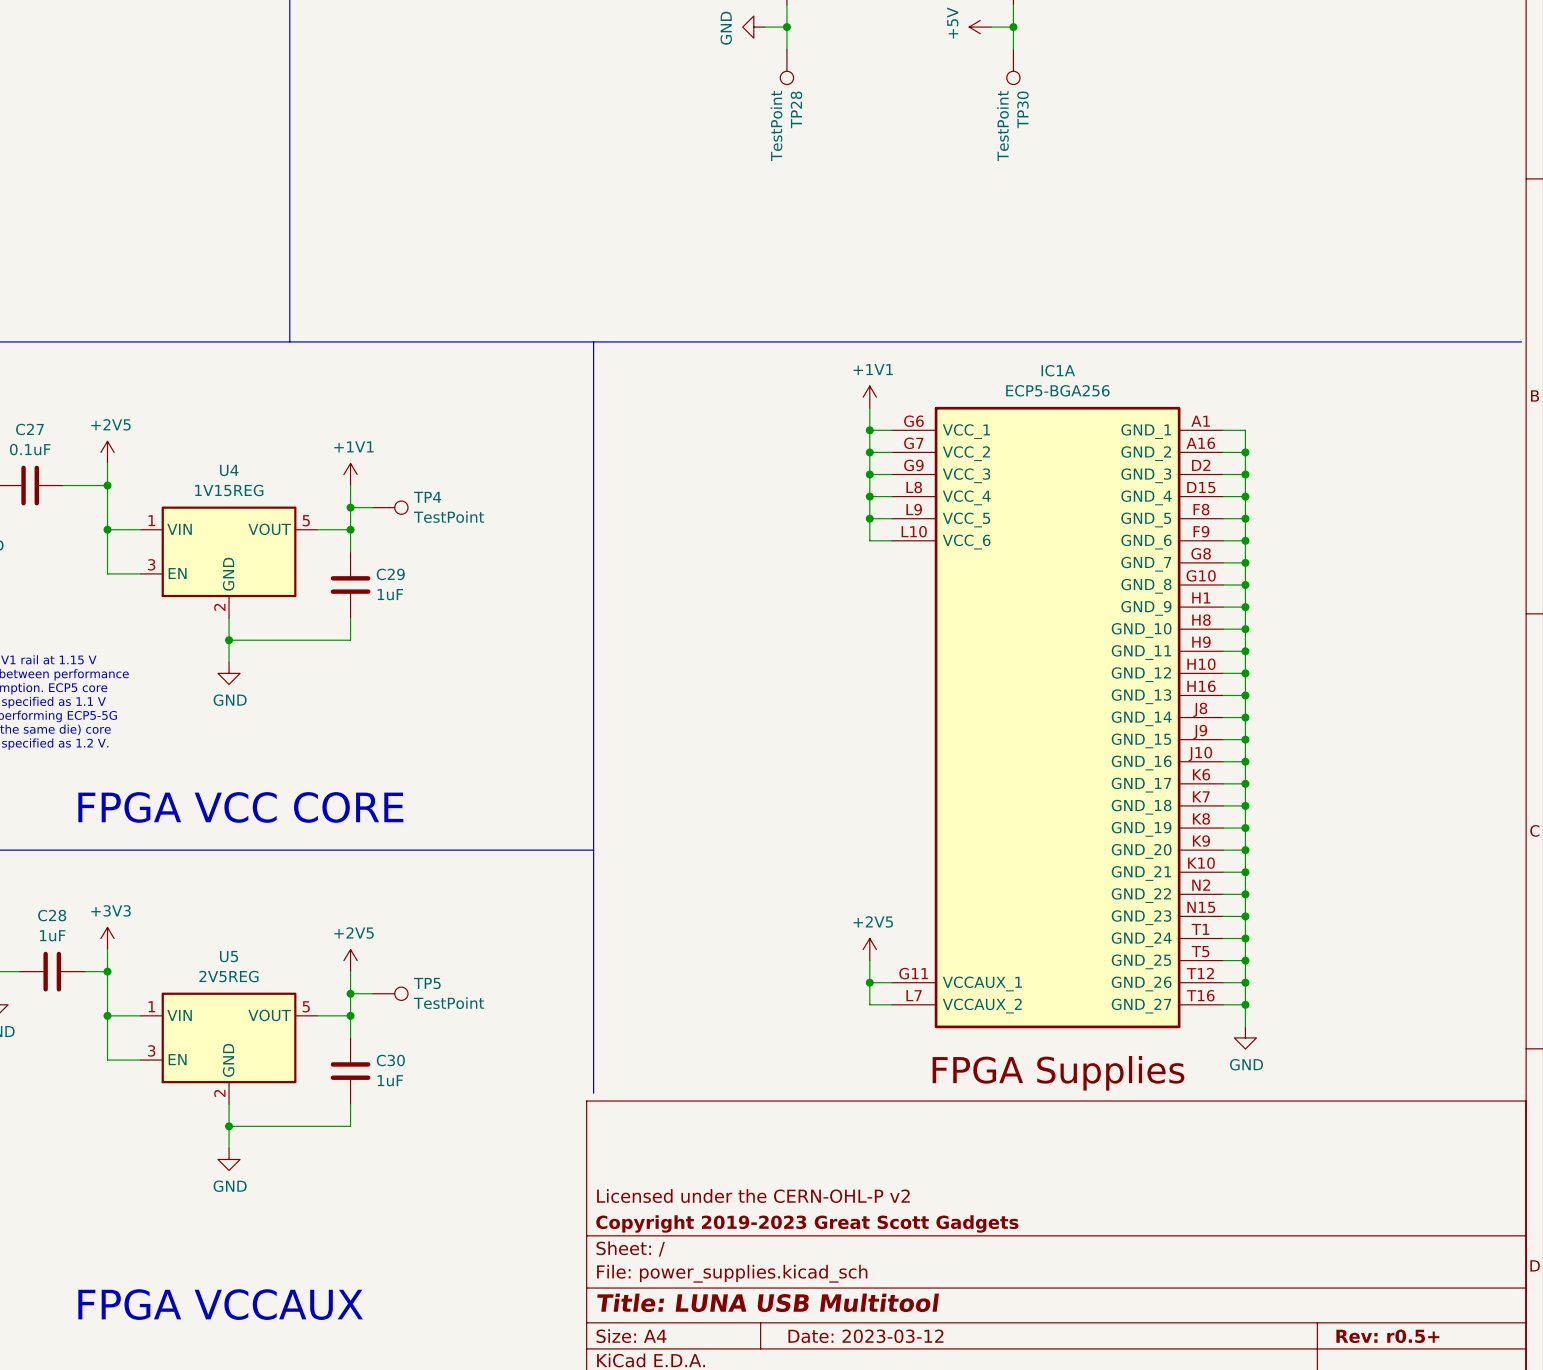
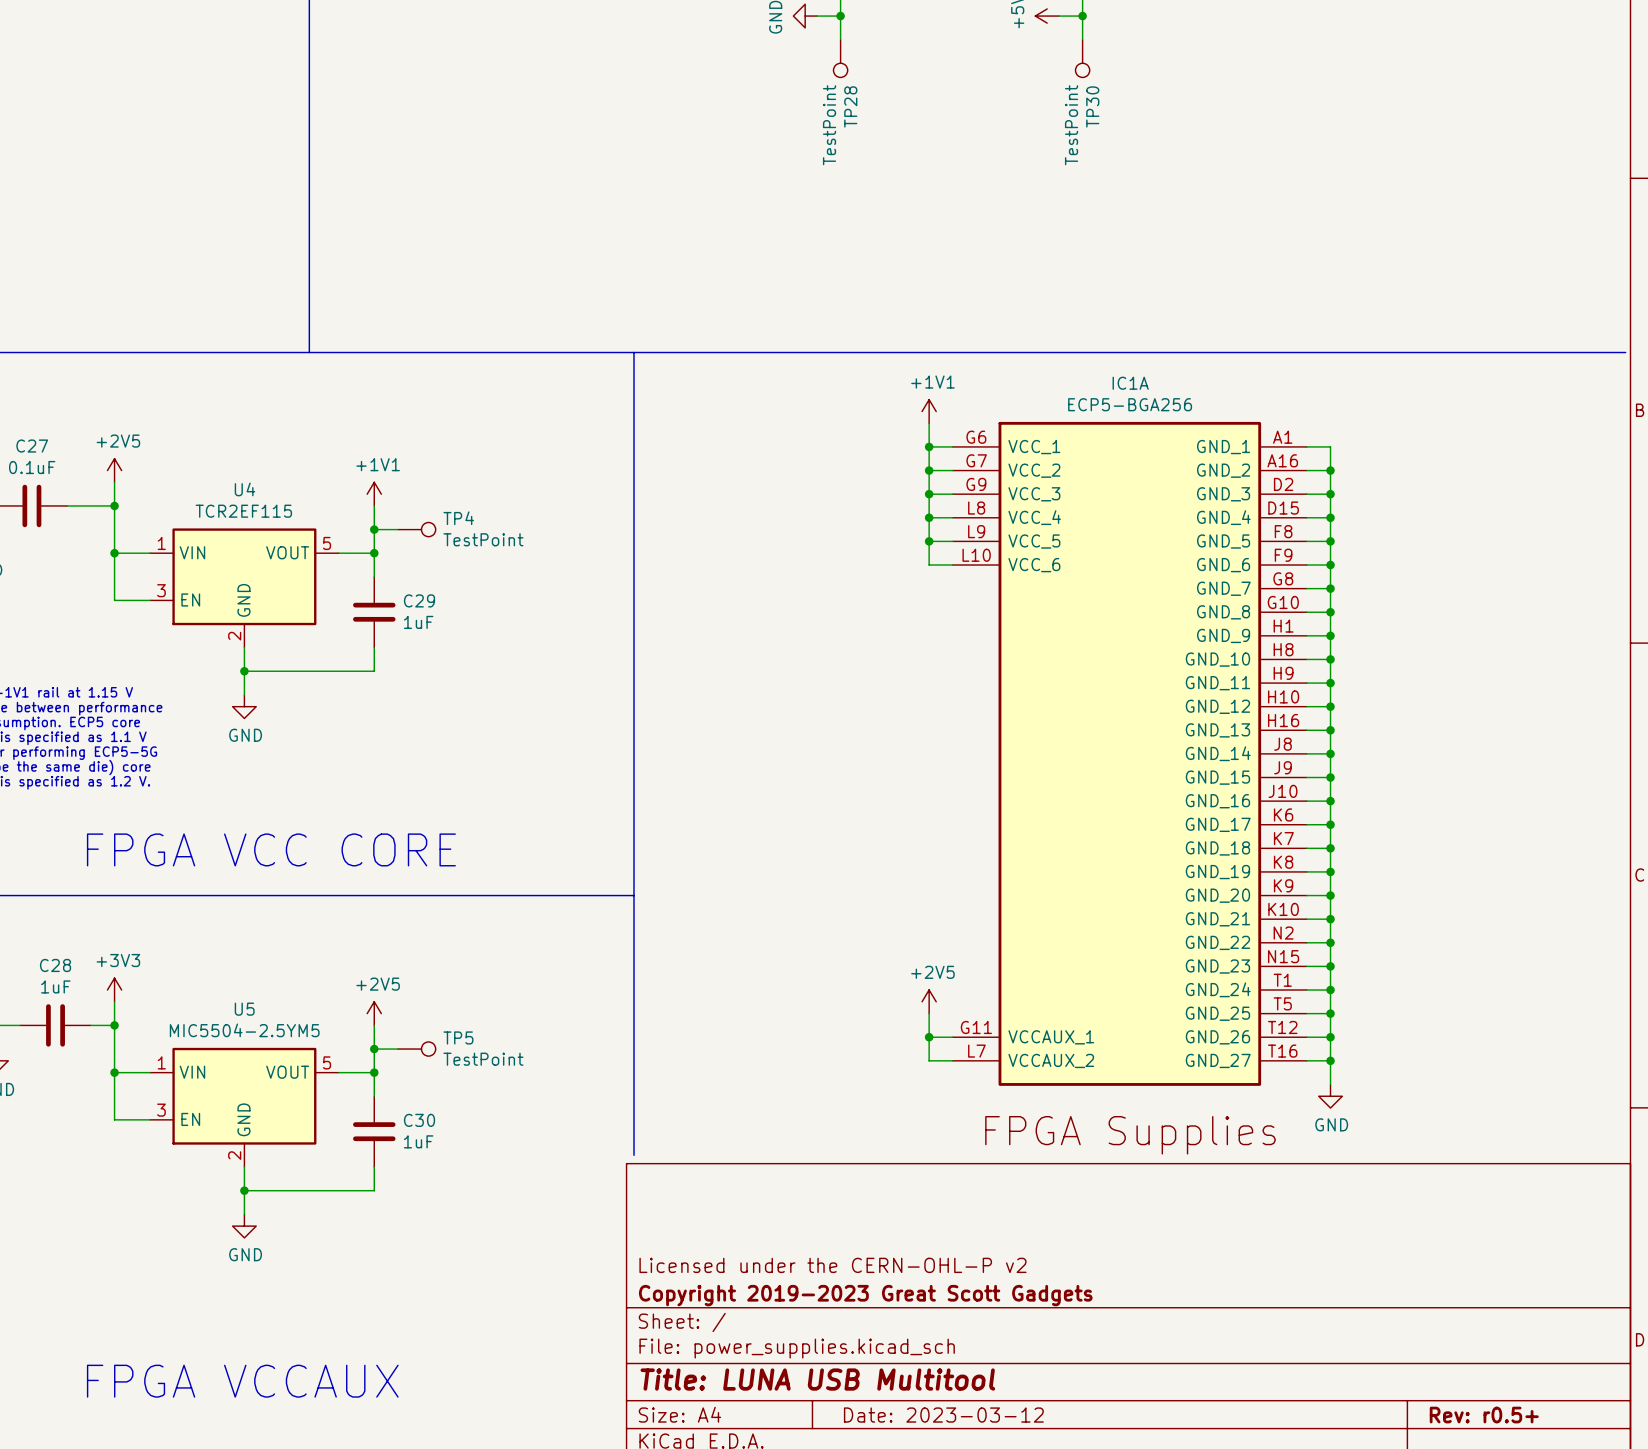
U4 value: 1V15REG (229, 490) -> TCR2EF115 (243, 511)
U5 value: 2V5REG (228, 976) -> MIC5504-2.5YM5 (244, 1030)

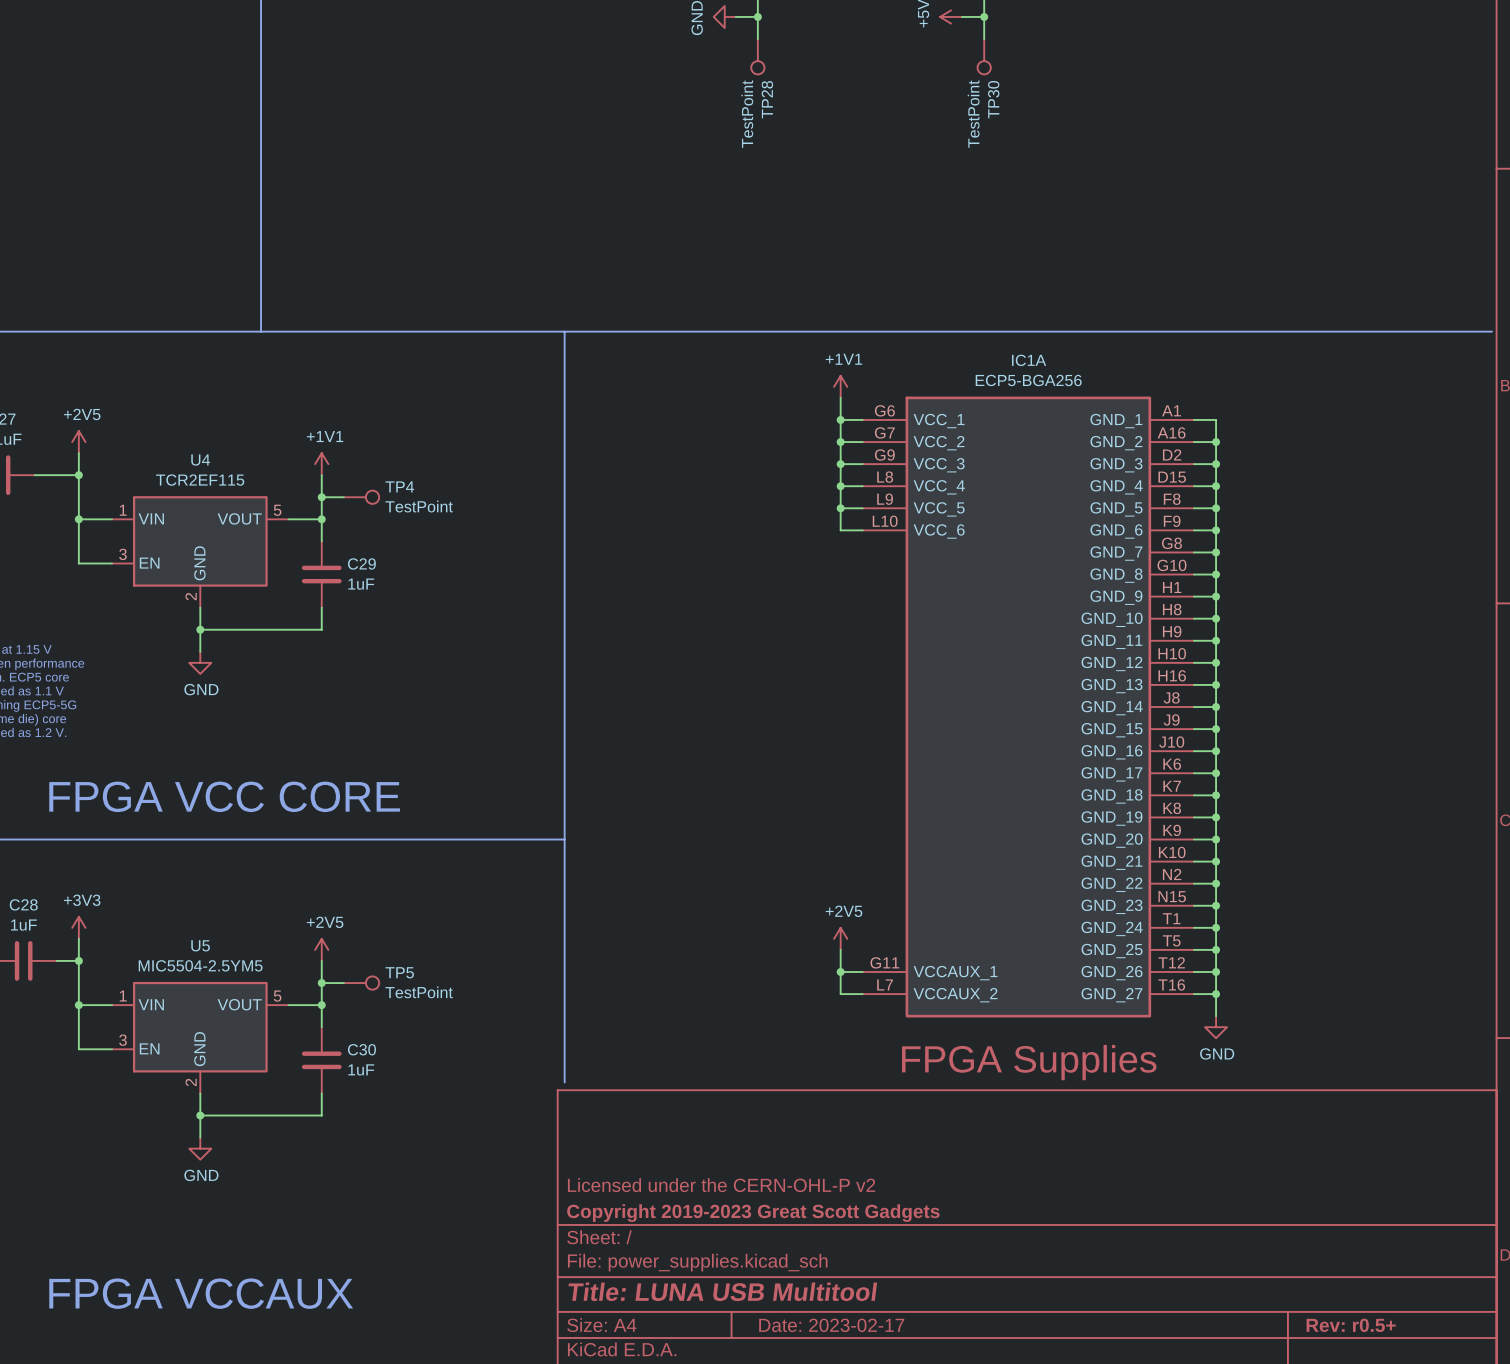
title block: Date: 2023-03-12 (943, 1415) -> Date: 2023-02-17 (831, 1325)

